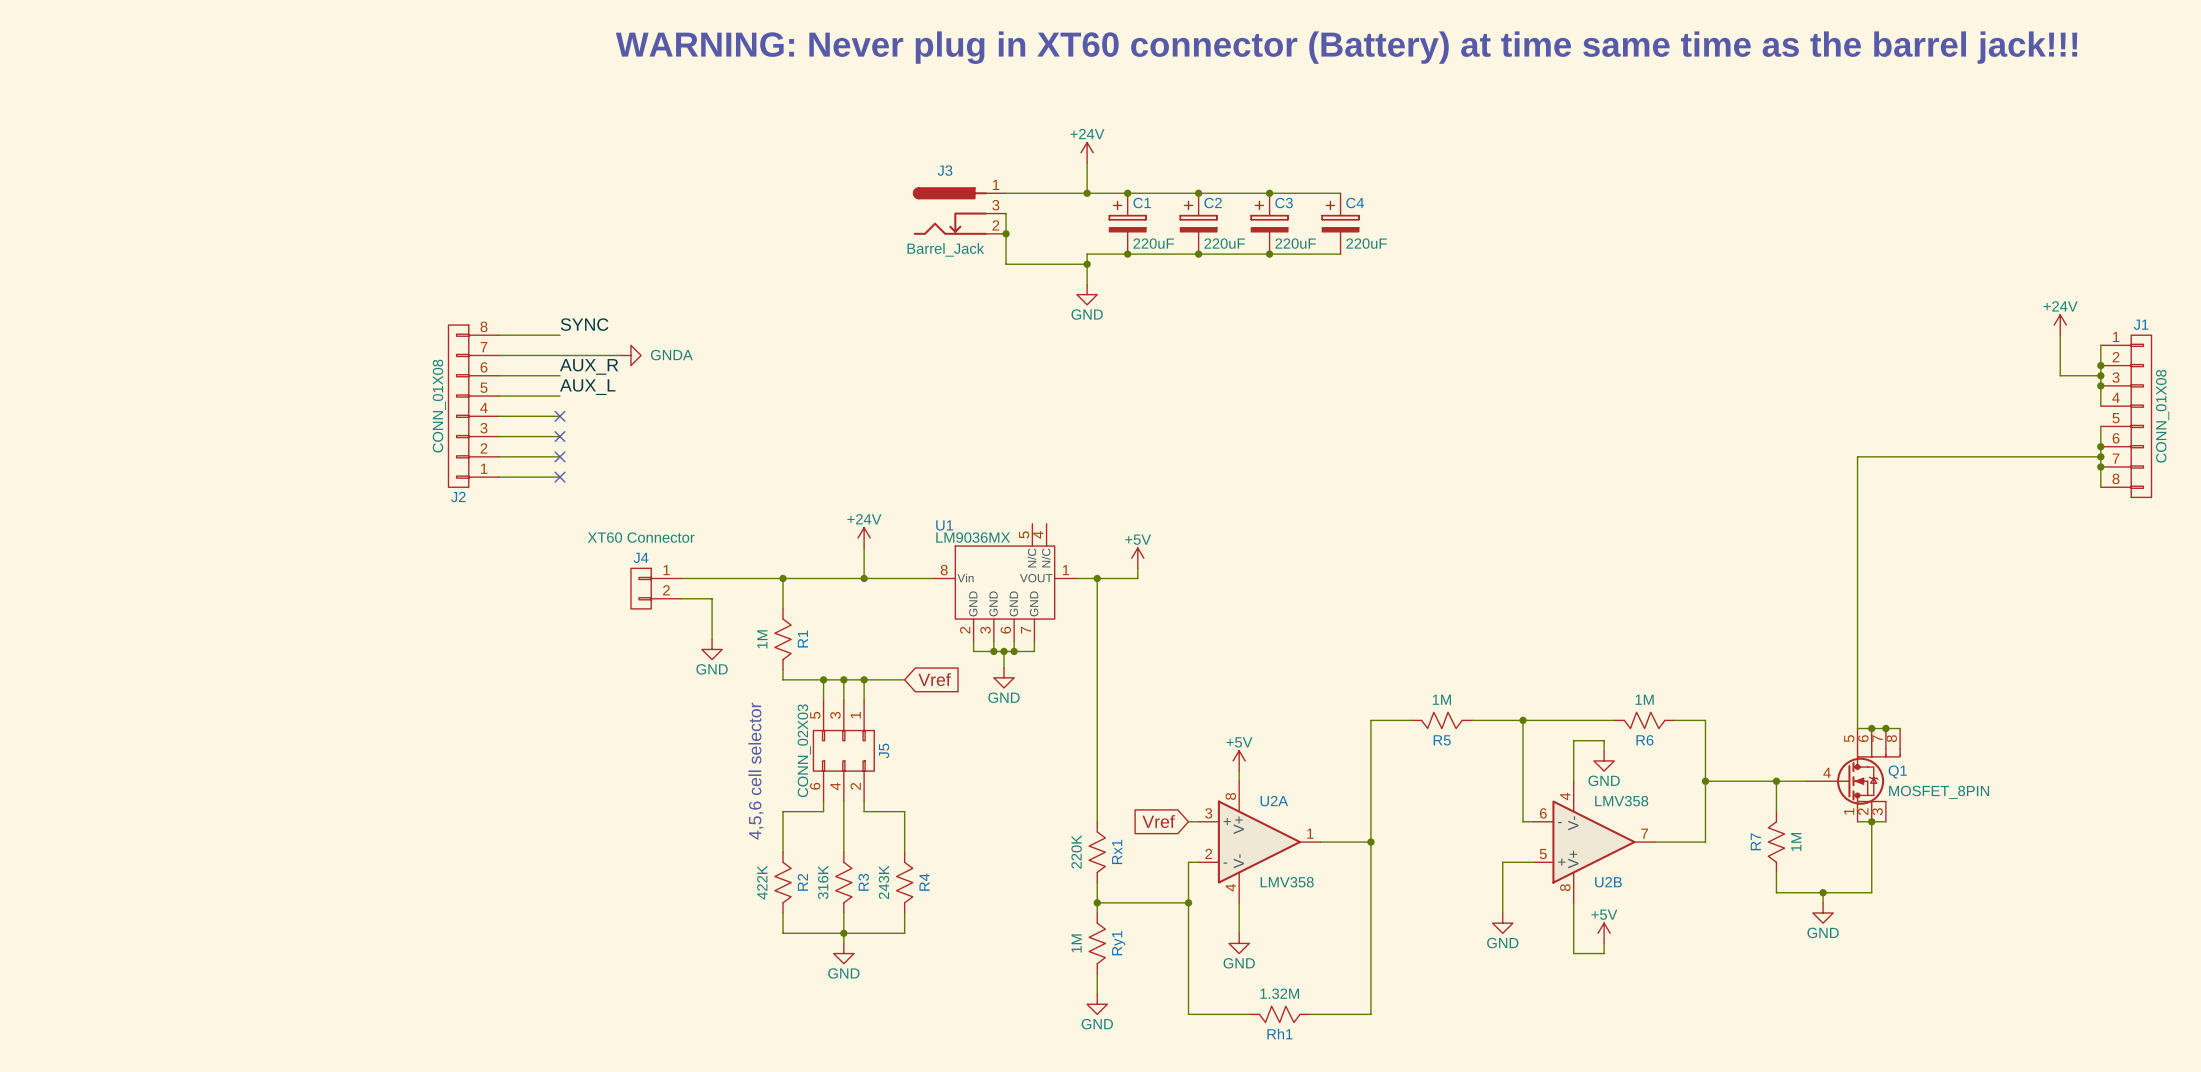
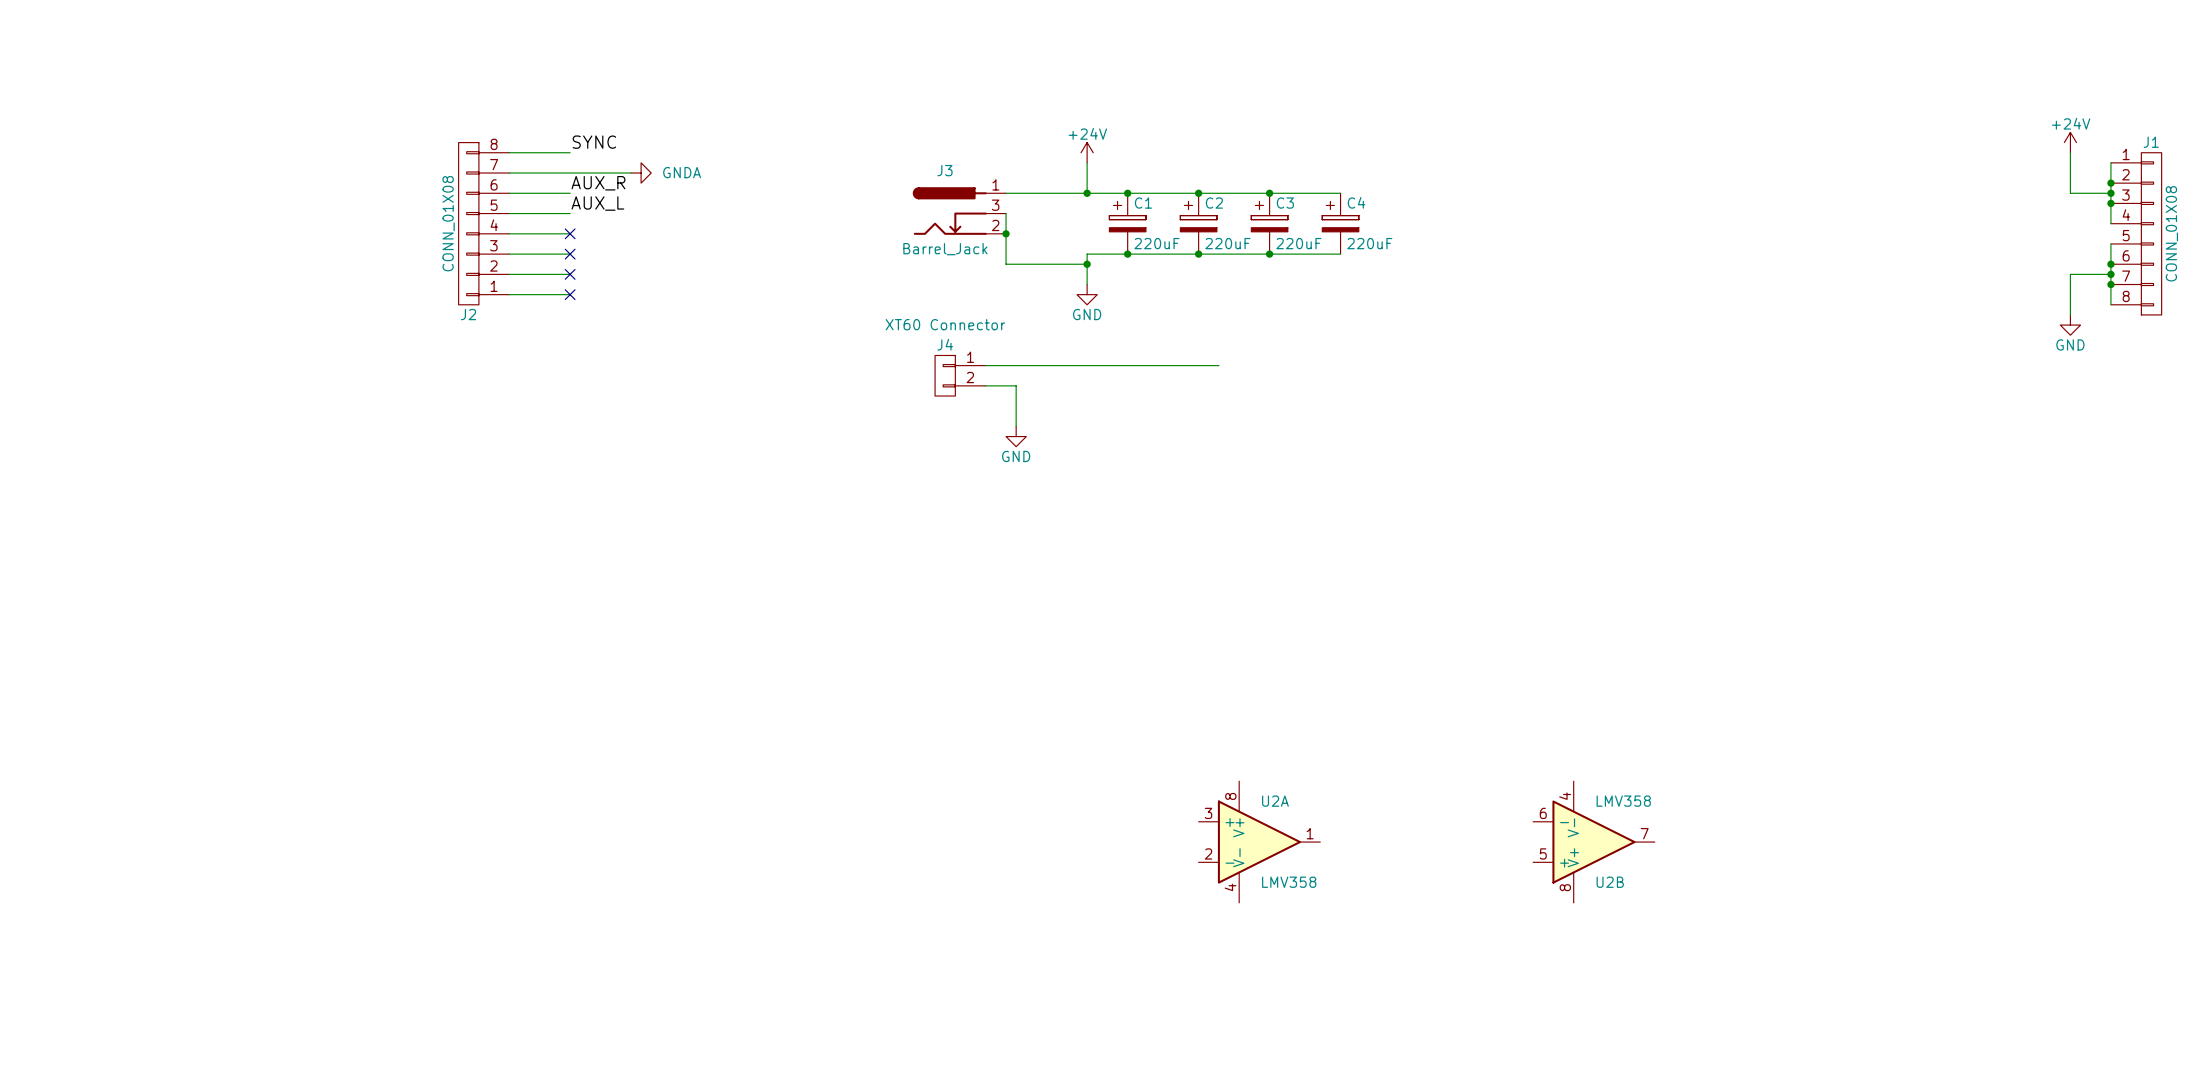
text: WARNING: Never plug in XT60 connector (Battery) at time same time as the barrel jack!!! (1346, 47) -> none
junction: none -> (2110, 183)
junction: none -> (2110, 193)
junction: none -> (2110, 203)
no-connect mark: none -> (570, 233)
no-connect mark: none -> (570, 254)
junction: none -> (2110, 264)
no-connect mark: none -> (570, 274)
wire: none -> (2110, 274) (2070, 274) (2070, 314)
junction: none -> (2110, 274)
junction: none -> (2110, 284)
no-connect mark: none -> (570, 294)
label position: SYNC (584, 324) -> SYNC (594, 142)
power symbol position: +24V (2060, 325) -> +24V (2070, 142)
power symbol: none -> GND (2070, 325)
wire: (499, 335) (560, 335) -> (509, 152) (570, 152)
wire: (2060, 335) (2060, 375) (2100, 375) -> (2070, 152) (2070, 193) (2110, 193)
wire: (2100, 345) (2100, 406) -> (2110, 162) (2110, 223)
wire: (499, 355) (620, 355) -> (509, 173) (630, 173)
power symbol position: GNDA (630, 355) -> GNDA (641, 173)
wire: none -> (985, 365) (1218, 365)
junction: (2100, 365) -> none
label position: AUX_R (589, 366) -> AUX_R (598, 183)
wire: (499, 375) (560, 375) -> (509, 193) (570, 193)
junction: (2100, 375) -> none
wire: none -> (985, 385) (1016, 385) (1016, 426)
junction: (2100, 385) -> none
label position: AUX_L (587, 387) -> AUX_L (597, 203)
wire: (499, 396) (560, 396) -> (509, 213) (570, 213)
J2 position: (473, 406) -> (483, 223)
wire: (499, 416) (560, 416) -> (509, 233) (570, 233)
no-connect mark: (560, 416) -> none
J1 position: (2126, 416) -> (2136, 233)
wire: (2100, 426) (2100, 487) -> (2110, 243) (2110, 304)
wire: (499, 436) (560, 436) -> (509, 254) (570, 254)
no-connect mark: (560, 436) -> none
power symbol: none -> GND (1016, 436)
junction: (2100, 446) -> none
wire: (499, 456) (560, 456) -> (509, 274) (570, 274)
no-connect mark: (560, 456) -> none
wire: (2100, 456) (1857, 456) (1857, 728) (1900, 728) -> none
junction: (2100, 456) -> none
junction: (2100, 466) -> none
wire: (499, 477) (560, 477) -> (509, 294) (570, 294)
no-connect mark: (560, 477) -> none
power symbol: +24V (864, 537) -> none
wire: (864, 548) (864, 578) -> none
power symbol: +5V (1137, 558) -> none
wire: (1137, 568) (1137, 578) (1076, 578) -> none
wire: (681, 578) (933, 578) -> none
wire: (783, 578) (783, 608) -> none
junction: (783, 578) -> none
junction: (864, 578) -> none
wire: (1097, 578) (1097, 821) -> none
junction: (1097, 578) -> none
U1: LM9036MX (1005, 582) -> none
J4 position: (656, 588) -> (960, 375)
wire: (681, 598) (712, 598) (712, 639) -> none
R1: 1M (783, 639) -> none
wire: (973, 641) (973, 651) (1034, 651) (1034, 641) -> none
wire: (993, 641) (993, 651) -> none
wire: (1014, 641) (1014, 651) -> none
power symbol: GND (712, 649) -> none
junction: (993, 651) -> none
wire: (1004, 651) (1004, 667) -> none
junction: (1004, 651) -> none
junction: (1014, 651) -> none
wire: (783, 669) (783, 679) (904, 679) -> none
power symbol: GND (1004, 677) -> none
wire: (823, 679) (823, 700) -> none
junction: (823, 679) -> none
wire: (843, 679) (843, 700) -> none
junction: (843, 679) -> none
wire: (864, 679) (864, 700) -> none
junction: (864, 679) -> none
global label: Vref (934, 679) -> none
wire: (1411, 720) (1370, 720) (1370, 1014) (1310, 1014) -> none
R5: 1M (1441, 720) -> none
wire: (1472, 720) (1614, 720) -> none
wire: (1523, 720) (1523, 821) (1533, 821) -> none
junction: (1523, 720) -> none
R6: 1M (1644, 720) -> none
wire: (1675, 720) (1705, 720) (1705, 842) (1654, 842) -> none
junction: (1871, 728) -> none
junction: (1885, 728) -> none
J5: CONN_02X03 (843, 750) -> none
wire: (1604, 750) (1604, 740) (1573, 740) (1573, 781) -> none
power symbol: +5V (1239, 760) -> none
power symbol: GND (1604, 760) -> none
text: 4,5,6 cell selector (755, 771) -> none
wire: (1239, 771) (1239, 781) -> none
Q1: MOSFET_8PIN (1853, 775) -> none
wire: (1705, 781) (1806, 781) -> none
junction: (1705, 781) -> none
wire: (1776, 781) (1776, 811) -> none
junction: (1776, 781) -> none
wire: (823, 801) (823, 811) (783, 811) (783, 852) -> none
wire: (843, 801) (843, 852) -> none
wire: (864, 801) (864, 811) (904, 811) (904, 852) -> none
global label: Vref (1158, 821) -> none
wire: (1188, 821) (1198, 821) -> none
wire: (1857, 821) (1885, 821) -> none
wire: (1871, 821) (1871, 892) (1776, 892) (1776, 872) -> none
junction: (1871, 821) -> none
wire: (1320, 842) (1370, 842) -> none
junction: (1370, 842) -> none
R7: 1M (1776, 842) -> none
Rx1: 220K (1097, 852) -> none
wire: (1198, 862) (1188, 862) (1188, 1014) (1249, 1014) -> none
wire: (1533, 862) (1502, 862) (1502, 913) -> none
R2: 422K (783, 882) -> none
R3: 316K (843, 882) -> none
R4: 243K (904, 882) -> none
wire: (1097, 882) (1097, 913) -> none
wire: (1823, 892) (1823, 902) -> none
junction: (1823, 892) -> none
wire: (1097, 902) (1188, 902) -> none
junction: (1097, 902) -> none
junction: (1188, 902) -> none
wire: (1239, 902) (1239, 933) -> none
wire: (1573, 902) (1573, 953) (1604, 953) (1604, 943) -> none
wire: (783, 913) (783, 933) (904, 933) (904, 913) -> none
wire: (843, 913) (843, 943) -> none
power symbol: GND (1823, 913) -> none
power symbol: GND (1502, 923) -> none
junction: (843, 933) -> none
power symbol: +5V (1604, 933) -> none
Ry1: 1M (1097, 943) -> none
power symbol: GND (1239, 943) -> none
power symbol: GND (843, 953) -> none
wire: (1097, 973) (1097, 994) -> none
power symbol: GND (1097, 1004) -> none
Rh1: 1.32M (1279, 1014) -> none

